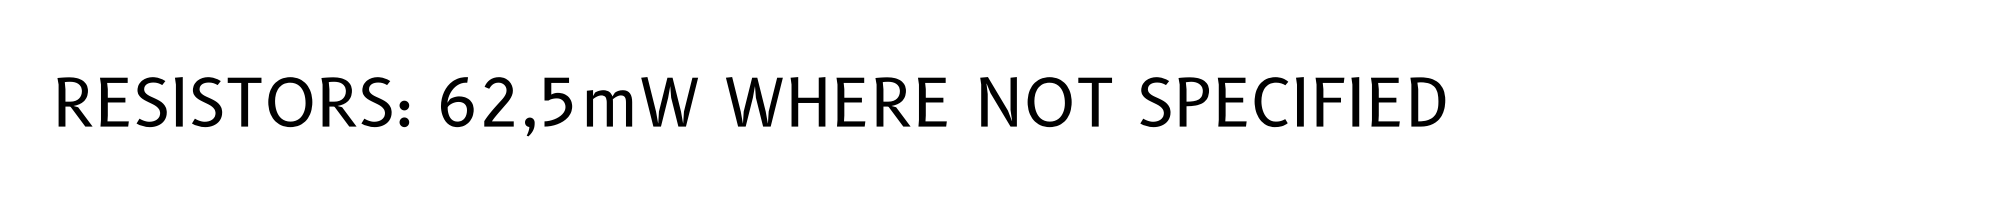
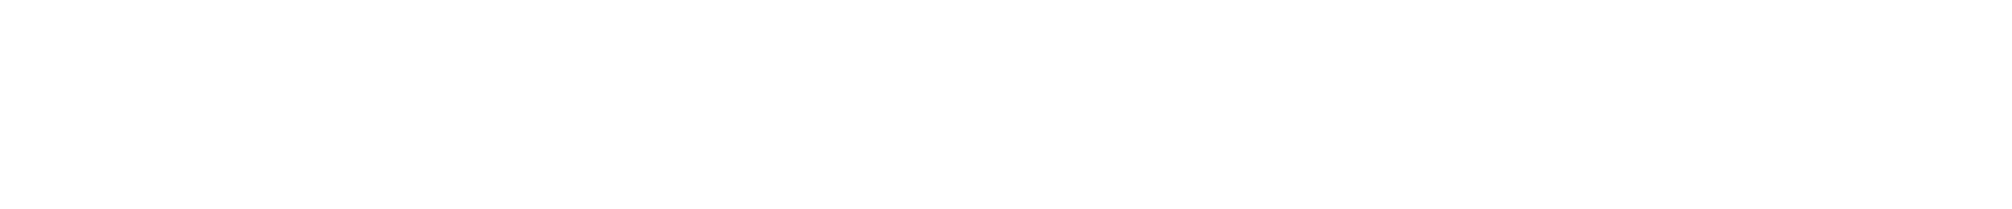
text: RESISTORS: 62,5mW WHERE NOT SPECIFIED (751, 106) -> none

